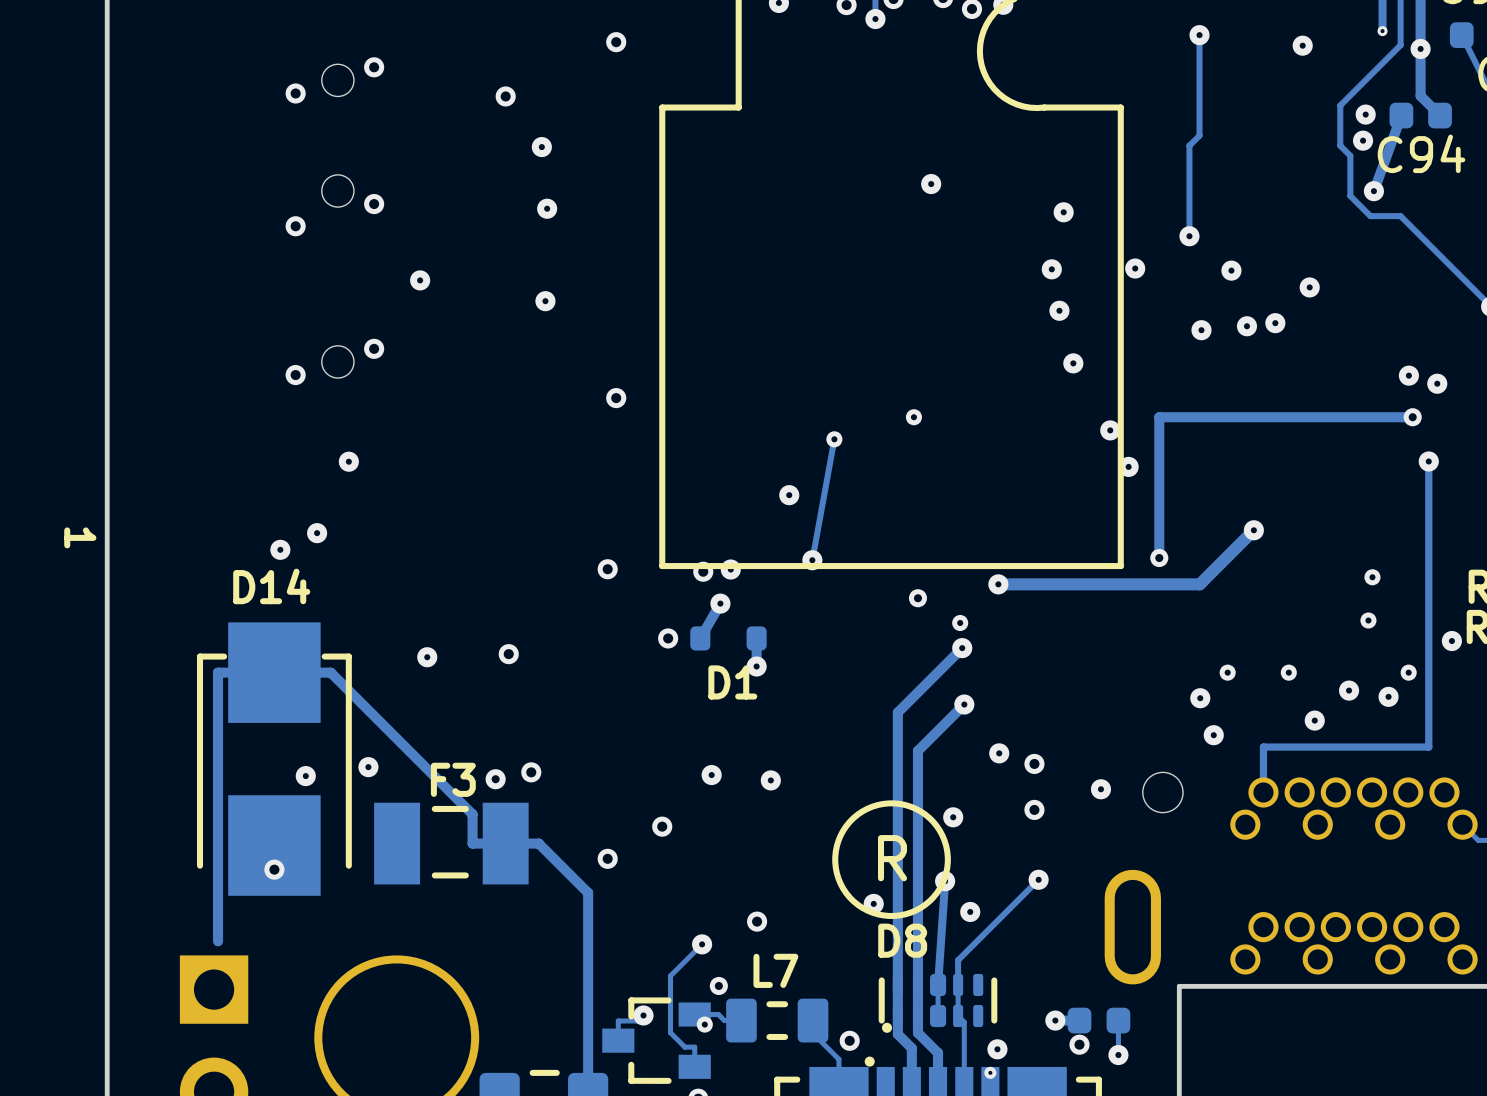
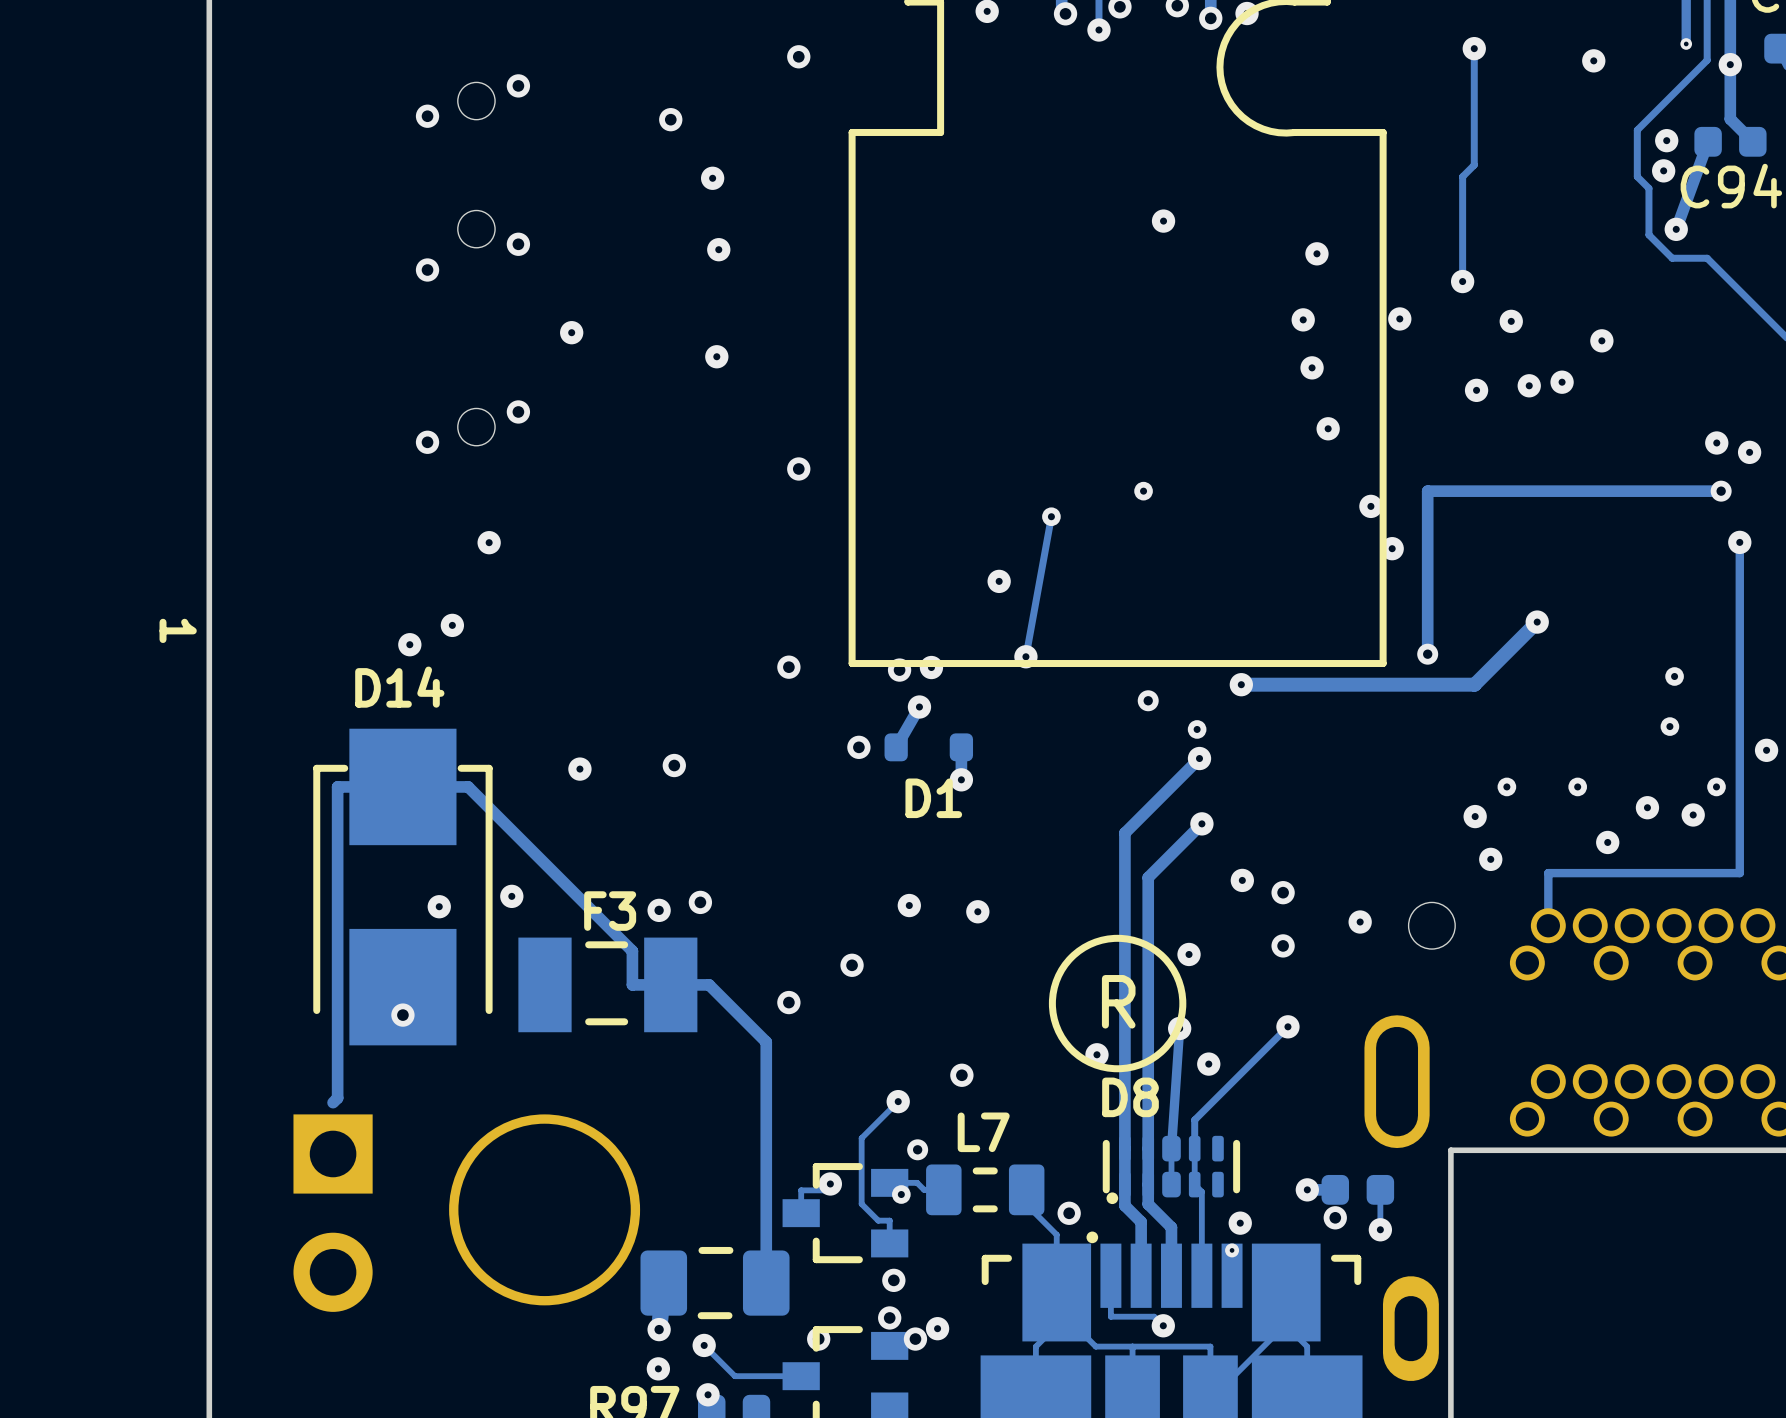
track: none -> (337, 1098) (333, 1102)

